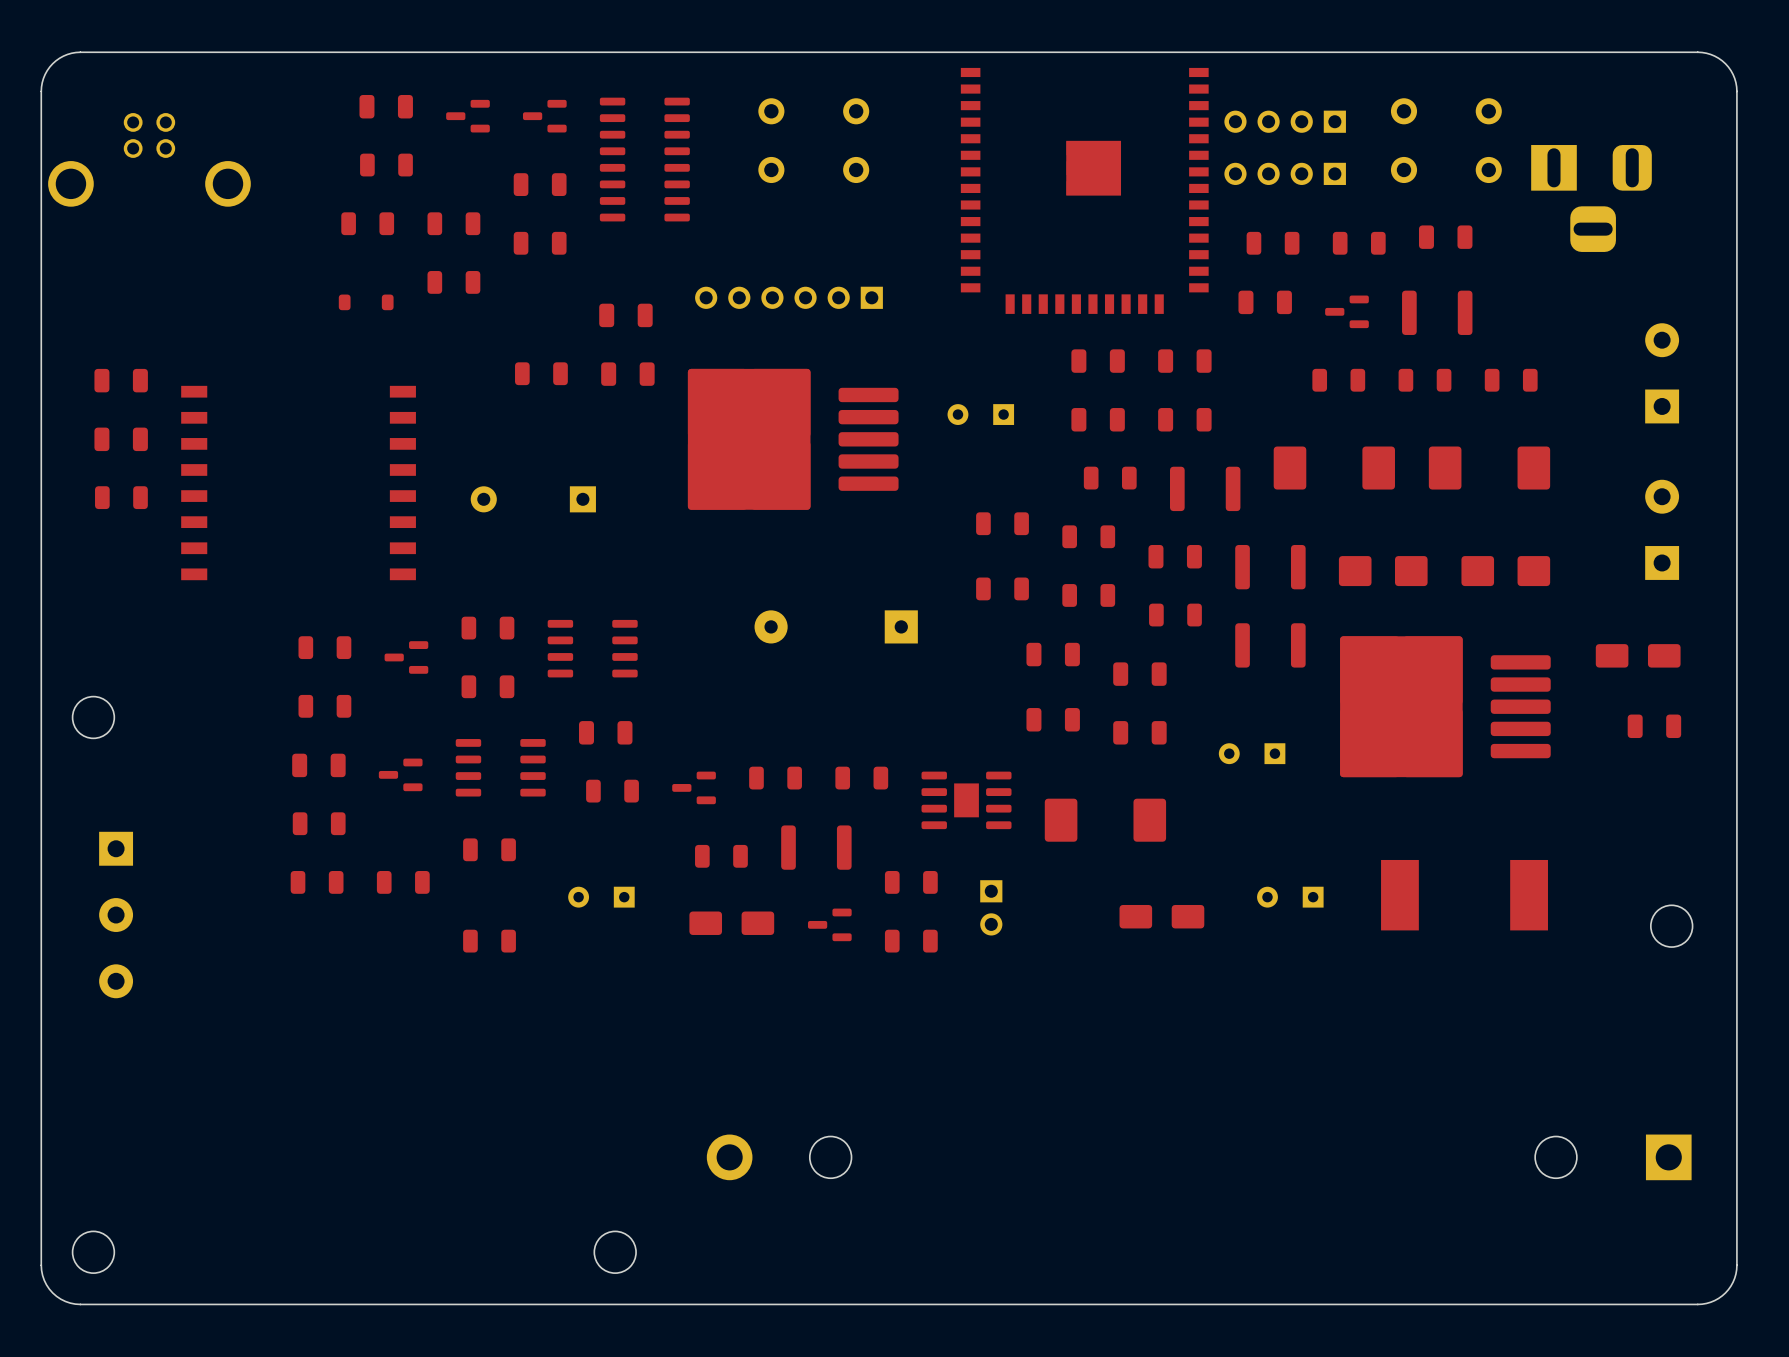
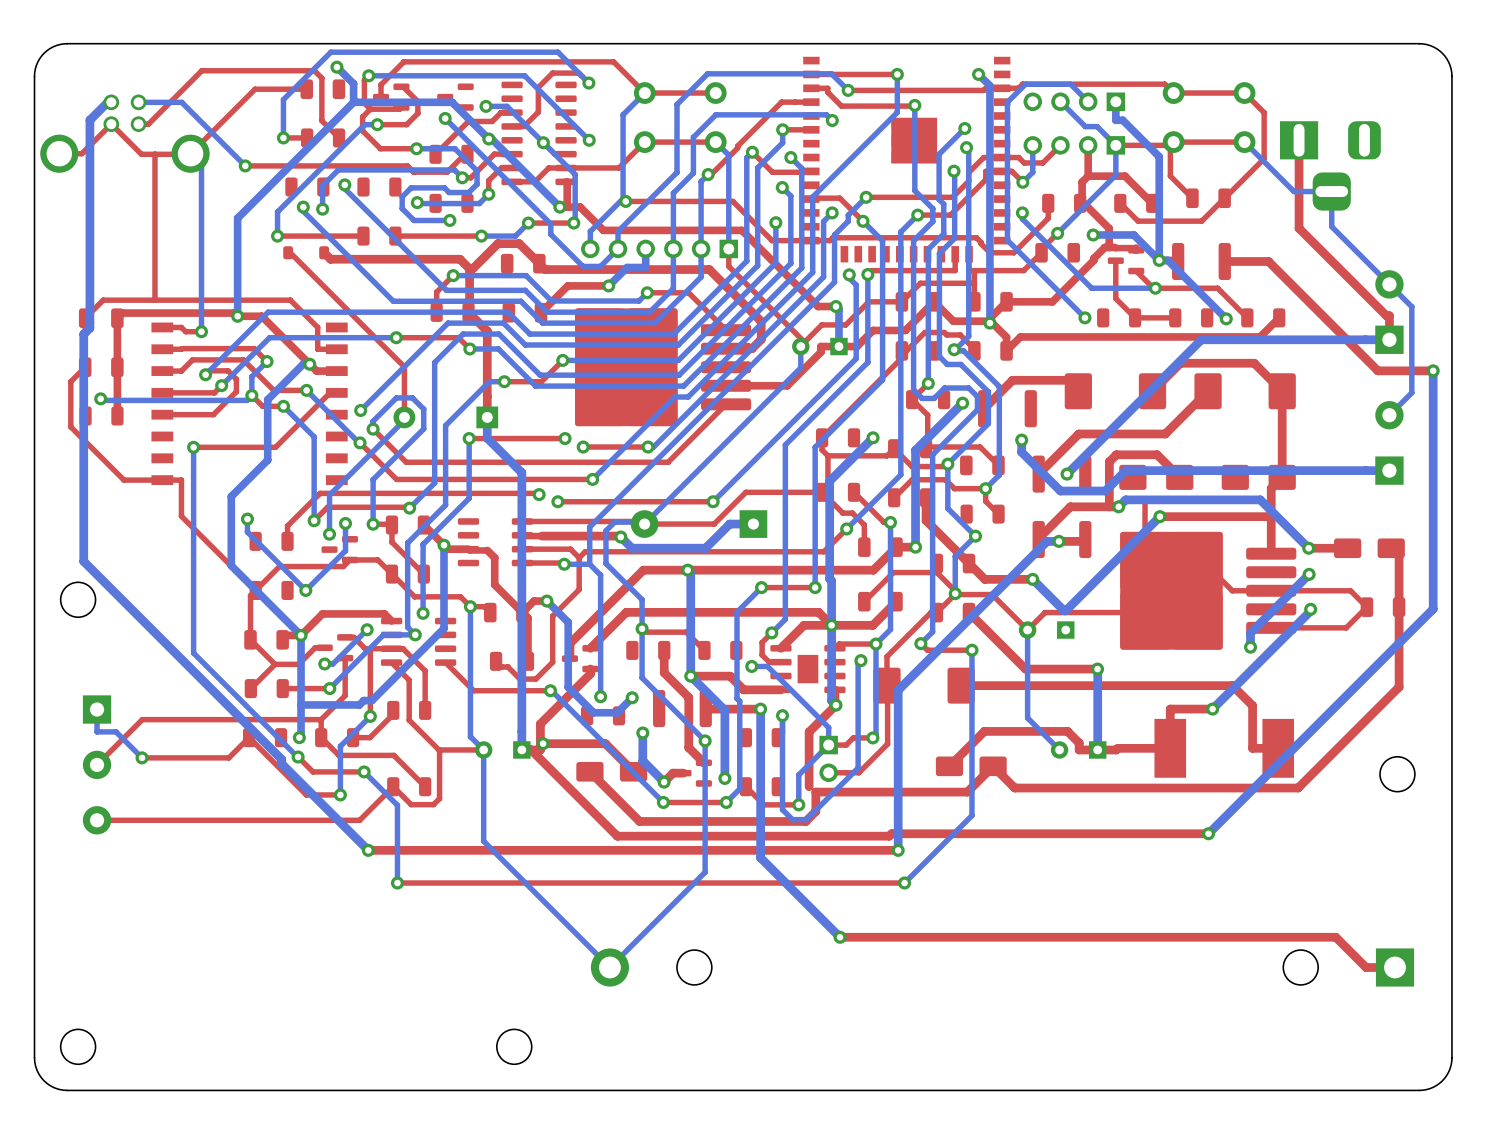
bottom track: none -> (336, 67) (353, 83) (353, 102)
via: none -> (336, 67)
top track: none -> (897, 74) (811, 74)
bottom track: none -> (897, 74) (897, 112) (812, 197) (812, 272) (688, 397) (675, 397) (592, 479)
via: none -> (897, 74)
bottom track: none -> (978, 74) (989, 85) (989, 323)
via: none -> (978, 74)
top track: none -> (368, 75) (364, 80) (364, 103) (370, 109)
bottom track: none -> (368, 75) (524, 75) (589, 140)
via: none -> (368, 75)
top track: none -> (588, 83) (578, 73) (552, 73) (538, 87) (538, 112) (524, 126) (512, 126)
bottom track: none -> (588, 83) (558, 52) (330, 52) (283, 99) (283, 137)
via: none -> (588, 83)
top track: none -> (401, 86) (417, 101) (417, 113) (406, 124) (377, 124)
top track: none -> (811, 88) (827, 88) (827, 92) (841, 106) (914, 105)
top track: none -> (306, 89) (255, 89) (190, 154) (141, 154) (111, 124) (81, 153) (59, 153)
top track: none -> (848, 90) (983, 90) (985, 88) (1018, 88) (1022, 84) (1164, 84) (1173, 93) (1244, 93) (1264, 112) (1264, 158) (1201, 221) (1138, 221) (1120, 203)
bottom track: none -> (848, 90) (831, 73) (707, 73) (677, 104) (677, 172) (618, 231) (618, 248) (600, 266) (582, 266) (550, 234) (550, 224) (445, 118)
via: none -> (848, 90)
bottom track: none -> (644, 93) (623, 114) (623, 198)
top track: none -> (715, 93) (644, 93) (613, 61) (403, 61) (380, 84) (380, 97)
bottom track: none -> (1060, 101) (1085, 126) (1097, 126) (1115, 145) (1115, 175) (1057, 233)
bottom track: none -> (1088, 101) (1070, 84) (1025, 84) (1007, 102) (1007, 240) (1084, 317)
bottom track: none -> (1115, 101) (1115, 120) (1122, 120) (1159, 156) (1159, 260)
bottom track: none -> (111, 102) (107, 102) (89, 120) (89, 328) (83, 334) (83, 561) (281, 759) (281, 763) (368, 850)
bottom track: none -> (138, 102) (181, 102) (245, 165)
bottom track: none -> (353, 102) (237, 218) (237, 316)
bottom track: none -> (353, 102) (452, 102) (559, 207)
top track: none -> (811, 102) (781, 102) (711, 174) (708, 174)
bottom track: none -> (914, 105) (914, 190) (932, 208) (932, 221) (913, 240) (913, 389) (922, 398) (934, 398) (944, 388) (968, 388) (977, 396) (977, 409) (932, 454) (932, 631) (920, 643)
via: none -> (914, 105)
bottom track: none -> (486, 106) (507, 106) (575, 174) (573, 223)
via: none -> (486, 106)
top track: none -> (401, 107) (399, 109) (370, 109)
top track: none -> (370, 109) (362, 117) (362, 130) (380, 148) (416, 148)
top track: none -> (512, 112) (501, 112) (492, 121) (468, 121) (435, 154)
via: none -> (445, 118)
bottom track: none -> (832, 120) (826, 114) (715, 114) (693, 137) (693, 173) (673, 193) (673, 288) (649, 312) (547, 312) (525, 290) (446, 290) (344, 188) (344, 184)
via: none -> (832, 120)
top track: none -> (138, 124) (148, 124) (201, 70) (314, 70) (321, 78) (321, 120) (339, 137)
bottom track: none -> (377, 124) (364, 124) (277, 211) (277, 236)
via: none -> (377, 124)
bottom track: none -> (964, 128) (939, 154) (939, 199) (943, 204) (943, 233) (928, 249) (928, 383)
via: none -> (964, 128)
bottom track: none -> (782, 129) (782, 142) (757, 167) (757, 265) (678, 345) (525, 345) (503, 323) (448, 323) (360, 410)
via: none -> (782, 129)
top track: none -> (811, 129) (782, 129)
via: none -> (283, 137)
top track: none -> (307, 137) (283, 137)
via: none -> (488, 139)
via: none -> (589, 140)
top track: none -> (1299, 140) (1299, 228) (1386, 315) (1389, 315) (1389, 339)
top track: none -> (715, 142) (644, 142) (618, 167) (548, 167) (534, 181) (512, 181)
bottom track: none -> (715, 142) (728, 155) (728, 248)
top track: none -> (1244, 142) (1173, 142) (1170, 145)
bottom track: none -> (1244, 142) (1293, 191) (1331, 191) (1331, 226) (1411, 306) (1411, 392) (1389, 415)
via: none -> (543, 142)
bottom track: none -> (1032, 145) (1032, 172) (1022, 182)
top track: none -> (1060, 145) (1042, 162) (1024, 162) (1018, 157) (983, 157) (968, 172) (968, 181) (952, 197) (866, 197)
top track: none -> (1088, 145) (1088, 176)
top track: none -> (1170, 145) (1170, 176) (1192, 198)
top track: none -> (1170, 145) (1115, 145)
bottom track: none -> (966, 147) (968, 149) (968, 336) (954, 350)
via: none -> (966, 147)
bottom track: none -> (416, 148) (454, 148) (477, 170) (477, 184) (468, 192) (449, 192) (444, 187) (411, 187) (402, 196) (402, 208) (414, 220) (449, 220)
via: none -> (416, 148)
top track: none -> (752, 152) (772, 172) (811, 171)
bottom track: none -> (752, 152) (746, 157) (746, 261) (673, 334) (529, 334) (508, 312) (268, 312) (205, 374)
via: none -> (752, 152)
bottom track: none -> (190, 153) (201, 164) (201, 331)
top track: none -> (154, 154) (154, 300)
top track: none -> (467, 154) (464, 154) (447, 172) (413, 172) (407, 165) (245, 165)
top track: none -> (512, 154) (494, 154) (470, 177) (462, 177)
bottom track: none -> (790, 157) (801, 168) (801, 267) (683, 386) (535, 386) (498, 348) (469, 348)
via: none -> (790, 157)
via: none -> (245, 165)
top track: none -> (512, 167) (501, 167) (488, 180) (488, 194)
bottom track: none -> (954, 171) (954, 238) (939, 253) (939, 356) (947, 364) (960, 364) (988, 391) (988, 423) (947, 464)
via: none -> (954, 171)
bottom track: none -> (708, 174) (701, 181) (701, 277) (654, 323) (542, 323) (520, 301) (393, 301) (303, 211) (303, 207)
via: none -> (708, 174)
top track: none -> (1088, 176) (1082, 182) (1082, 201)
top track: none -> (1088, 176) (1124, 176) (1152, 203)
bottom track: none -> (462, 177) (454, 169) (338, 169) (322, 185) (322, 209)
via: none -> (462, 177)
top track: none -> (566, 181) (567, 207)
top track: none -> (1022, 182) (1011, 171) (985, 171) (985, 179) (950, 215) (917, 215)
via: none -> (1022, 182)
via: none -> (344, 184)
bottom track: none -> (782, 187) (790, 196) (790, 263) (679, 375) (540, 375) (498, 334) (463, 334) (434, 362) (434, 483) (409, 508)
via: none -> (782, 187)
bottom track: none -> (488, 194) (479, 203) (417, 202)
via: none -> (488, 194)
bottom track: none -> (866, 197) (848, 215) (848, 221) (834, 234) (834, 282) (589, 527) (589, 564)
via: none -> (866, 197)
bottom track: none -> (623, 198) (590, 231) (590, 248)
top track: none -> (811, 199) (839, 198) (863, 221)
top track: none -> (625, 201) (732, 201) (772, 240) (830, 240) (832, 237) (976, 237) (990, 252) (1013, 252) (1048, 218) (1048, 203)
via: none -> (625, 201)
top track: none -> (1082, 201) (1109, 228) (1109, 247)
via: none -> (417, 202)
via: none -> (303, 207)
top track: none -> (559, 207) (580, 207) (603, 230) (741, 230) (818, 306) (835, 306)
via: none -> (559, 207)
via: none -> (322, 209)
bottom track: none -> (832, 212) (823, 221) (823, 276) (653, 447) (647, 447)
via: none -> (832, 212)
bottom track: none -> (1022, 212) (1022, 218) (1091, 288) (1155, 288)
via: none -> (1022, 212)
bottom track: none -> (917, 215) (900, 232) (900, 474) (846, 528)
via: none -> (917, 215)
via: none -> (449, 220)
bottom track: none -> (863, 221) (882, 240) (882, 379) (815, 447) (815, 587)
via: none -> (863, 221)
bottom track: none -> (528, 223) (515, 236) (481, 236)
via: none -> (528, 223)
top track: none -> (573, 223) (528, 223)
via: none -> (573, 223)
bottom track: none -> (775, 222) (775, 262) (678, 360) (562, 360)
via: none -> (775, 222)
top track: none -> (1057, 233) (1023, 270) (969, 270) (969, 254)
via: none -> (1057, 233)
bottom track: none -> (1093, 235) (1133, 235) (1159, 260)
via: none -> (1093, 234)
via: none -> (277, 236)
top track: none -> (363, 236) (277, 236)
top track: none -> (481, 236) (395, 236)
via: none -> (481, 236)
bottom track: none -> (645, 248) (645, 267) (627, 267) (608, 285)
top track: none -> (728, 248) (728, 266) (804, 342) (821, 324) (845, 324) (868, 301) (901, 301) (920, 283) (974, 283)
top track: none -> (1136, 250) (1136, 248) (1104, 247) (1052, 301) (1006, 301) (990, 317) (990, 321)
top track: none -> (288, 252) (404, 366) (404, 417)
top track: none -> (324, 252) (330, 259) (459, 259) (469, 268)
top track: none -> (955, 254) (955, 270) (871, 270) (867, 274)
top track: none -> (1115, 260) (1115, 298) (1135, 317) (1175, 317)
bottom track: none -> (1159, 260) (1167, 260) (1226, 318)
via: none -> (1159, 260)
top track: none -> (1224, 261) (1268, 261) (1377, 370) (1433, 370)
top track: none -> (469, 268) (468, 312) (487, 331) (487, 417)
top track: none -> (469, 268) (472, 268) (497, 243) (519, 243) (545, 269) (709, 269) (761, 321) (761, 339) (752, 348) (726, 348)
top track: none -> (974, 270) (974, 301)
top track: none -> (1136, 271) (1153, 288) (1217, 288) (1247, 317)
bottom track: none -> (849, 274) (849, 278) (856, 285) (856, 358) (713, 501)
via: none -> (849, 274)
bottom track: none -> (867, 274) (867, 362) (785, 444) (785, 619) (771, 632)
via: none -> (867, 274)
top track: none -> (453, 275) (436, 292) (436, 312)
bottom track: none -> (453, 275) (526, 275) (551, 301) (639, 301) (647, 292)
via: none -> (453, 275)
top track: none -> (608, 285) (567, 285) (540, 312)
via: none -> (608, 285)
via: none -> (1155, 288)
top track: none -> (647, 292) (688, 292) (726, 330)
via: none -> (647, 292)
bottom track: none -> (835, 306) (838, 309) (838, 346)
via: none -> (835, 306)
via: none -> (237, 316)
via: none -> (1084, 317)
top track: none -> (1279, 317) (1260, 336) (1020, 336) (1006, 350) (1006, 337) (990, 321)
via: none -> (1226, 318)
top track: none -> (990, 321) (953, 321) (934, 301) (905, 330) (873, 330) (856, 346) (820, 346) (820, 352) (787, 385) (726, 385)
via: none -> (989, 323)
top track: none -> (162, 327) (181, 327) (185, 331) (201, 331)
via: none -> (201, 331)
top track: none -> (396, 337) (458, 337) (469, 348)
bottom track: none -> (396, 337) (269, 337) (221, 385)
via: none -> (396, 337)
bottom track: none -> (1389, 339) (1201, 339) (1067, 474)
bottom track: none -> (800, 346) (800, 367) (644, 524) (642, 522) (614, 522) (605, 530) (605, 563) (642, 599) (642, 677) (705, 740) (705, 872) (609, 967) (483, 841) (483, 749) (470, 736) (470, 606)
top track: none -> (162, 349) (254, 348) (267, 361)
top track: none -> (336, 349) (317, 349) (317, 327) (290, 300) (103, 300) (85, 318) (85, 367) (70, 381) (70, 426) (123, 480) (181, 480) (181, 516) (255, 590)
via: none -> (469, 348)
via: none -> (954, 349)
bottom track: none -> (954, 350) (963, 350) (999, 386) (999, 475) (985, 488)
top track: none -> (974, 350) (960, 334) (924, 332) (906, 350) (901, 350) (901, 358) (822, 437) (822, 450) (827, 455)
top track: none -> (562, 360) (541, 381) (504, 381)
via: none -> (562, 360)
bottom track: none -> (267, 361) (251, 376) (251, 395) (246, 400) (102, 400) (100, 398)
via: none -> (267, 361)
bottom track: none -> (309, 364) (303, 364) (267, 399) (267, 460) (231, 496) (231, 565) (301, 635) (301, 735) (299, 737)
via: none -> (309, 364)
top track: none -> (162, 371) (181, 371) (192, 359) (243, 359) (273, 390) (306, 390)
top track: none -> (336, 371) (316, 371) (261, 316) (237, 316) (234, 313) (122, 313) (117, 318) (117, 415)
bottom track: none -> (1433, 370) (1433, 609) (1208, 833)
via: none -> (1433, 370)
top track: none -> (205, 374) (209, 370) (227, 370) (236, 379) (236, 391) (213, 414) (162, 414)
via: none -> (205, 374)
bottom track: none -> (504, 381) (489, 381) (445, 425) (445, 505) (407, 543) (407, 627) (415, 634) (383, 634) (329, 688)
via: none -> (504, 381)
top track: none -> (928, 383) (912, 399) (927, 415) (927, 447)
via: none -> (928, 383)
top track: none -> (221, 385) (214, 392) (162, 392)
via: none -> (221, 385)
bottom track: none -> (306, 390) (360, 442)
via: none -> (306, 390)
top track: none -> (1078, 391) (1067, 380) (1012, 380) (984, 408)
top track: none -> (1152, 391) (1180, 363) (1254, 363) (1282, 391) (1282, 477) (1271, 488) (1271, 553)
top track: none -> (1208, 391) (1165, 433) (1078, 433) (1038, 474)
top track: none -> (336, 392) (330, 392) (275, 447) (193, 447)
top track: none -> (251, 395) (262, 406) (283, 406)
via: none -> (251, 395)
via: none -> (100, 398)
bottom track: none -> (962, 403) (915, 450) (915, 547)
via: none -> (962, 403)
top track: none -> (726, 404) (668, 462) (406, 462) (373, 429)
bottom track: none -> (283, 406) (314, 436) (314, 520)
via: none -> (283, 406)
via: none -> (360, 410)
bottom track: none -> (404, 417) (404, 420) (329, 495) (329, 534)
bottom track: none -> (487, 417) (487, 438) (521, 472) (521, 749)
bottom track: none -> (373, 429) (373, 421) (396, 397) (412, 397) (423, 409) (423, 428) (373, 479) (373, 524)
via: none -> (373, 429)
bottom track: none -> (873, 437) (829, 481) (831, 700) (835, 705)
via: none -> (873, 437)
bottom track: none -> (469, 438) (469, 498) (423, 544) (423, 613)
via: none -> (469, 438)
top track: none -> (565, 438) (469, 438)
via: none -> (565, 438)
bottom track: none -> (1021, 440) (1021, 452) (1060, 491) (1105, 491) (1125, 470) (1389, 470)
via: none -> (1021, 440)
top track: none -> (360, 442) (396, 479) (592, 479)
via: none -> (360, 442)
via: none -> (583, 447)
top track: none -> (647, 447) (583, 447)
via: none -> (647, 447)
top track: none -> (927, 447) (980, 447) (998, 465)
bottom track: none -> (193, 447) (193, 653) (298, 757)
via: none -> (193, 447)
top track: none -> (827, 455) (827, 486) (822, 492)
top track: none -> (827, 455) (887, 455) (894, 448) (912, 466) (945, 466) (947, 464)
bottom track: none -> (947, 464) (947, 508) (975, 536) (955, 556) (955, 593)
via: none -> (947, 464)
via: none -> (1067, 474)
top track: none -> (1179, 477) (1157, 454) (1116, 454) (1109, 461) (1109, 506)
via: none -> (592, 479)
via: none -> (985, 488)
top track: none -> (822, 492) (842, 513) (852, 513) (864, 524) (864, 547)
top track: none -> (822, 492) (745, 492) (714, 524) (644, 524) (642, 521) (522, 521)
top track: none -> (853, 492) (884, 522) (890, 522)
top track: none -> (539, 494) (320, 493) (287, 525) (287, 541)
via: none -> (539, 494)
top track: none -> (894, 497) (912, 479) (945, 479) (954, 488) (985, 488) (985, 501) (998, 514)
top track: none -> (926, 497) (926, 520) (984, 579) (1032, 579)
top track: none -> (1145, 498) (1145, 560) (1202, 560) (1232, 590) (1350, 590) (1366, 607) (1346, 627) (1271, 627)
via: none -> (557, 501)
top track: none -> (713, 501) (557, 501)
via: none -> (713, 501)
top track: none -> (1118, 506) (1070, 506) (1038, 539)
bottom track: none -> (1118, 506) (1125, 499) (1260, 499) (1308, 548)
via: none -> (1118, 506)
top track: none -> (409, 508) (327, 507) (314, 520)
via: none -> (409, 508)
bottom track: none -> (1159, 516) (1065, 610) (1032, 579)
via: none -> (1159, 516)
top track: none -> (1271, 516) (1159, 516)
bottom track: none -> (247, 519) (247, 532) (305, 590) (345, 550) (345, 523)
via: none -> (247, 519)
via: none -> (314, 520)
bottom track: none -> (890, 522) (890, 629) (876, 644) (876, 734) (872, 737)
via: none -> (890, 522)
via: none -> (345, 523)
bottom track: none -> (753, 524) (729, 524) (705, 548) (631, 548) (620, 537)
top track: none -> (373, 524) (391, 524) (391, 542) (423, 574)
via: none -> (373, 524)
top track: none -> (423, 525) (447, 549) (487, 550) (494, 557) (494, 584) (527, 618) (527, 661)
top track: none -> (846, 528) (823, 551) (585, 551) (579, 557)
via: none -> (846, 528)
via: none -> (329, 534)
top track: none -> (522, 535) (620, 537)
via: none -> (975, 536)
via: none -> (620, 537)
top track: none -> (1085, 539) (1083, 541) (1058, 541)
bottom track: none -> (1058, 541) (1047, 541) (898, 690) (898, 850)
via: none -> (1058, 541)
bottom track: none -> (443, 545) (443, 628) (371, 700) (363, 700) (359, 704) (301, 704)
via: none -> (443, 545)
top track: none -> (915, 547) (896, 547) (873, 570) (643, 570) (569, 643) (569, 658)
via: none -> (915, 547)
via: none -> (1308, 548)
top track: none -> (1347, 548) (1308, 548)
top track: none -> (1391, 548) (1399, 556) (1399, 687) (1298, 788) (1014, 788) (993, 766) (967, 792) (815, 792) (815, 811) (805, 821) (639, 821) (589, 771)
top track: none -> (522, 549) (570, 549) (579, 557)
top track: none -> (579, 557) (579, 589) (552, 616) (552, 662) (535, 679) (520, 679) (507, 666) (501, 666) (496, 661)
top track: none -> (522, 563) (564, 564)
via: none -> (564, 564)
bottom track: none -> (589, 564) (564, 564)
bottom track: none -> (589, 564) (600, 575) (600, 696)
bottom track: none -> (687, 570) (690, 573) (690, 676) (724, 710) (724, 778)
via: none -> (687, 570)
top track: none -> (936, 572) (893, 572) (864, 601)
top track: none -> (936, 572) (954, 590) (954, 594)
bottom track: none -> (1309, 574) (1250, 633) (1250, 647)
via: none -> (1309, 574)
via: none -> (1032, 579)
bottom track: none -> (761, 587) (737, 612) (739, 789) (726, 802)
via: none -> (761, 587)
top track: none -> (815, 587) (761, 587)
via: none -> (815, 587)
via: none -> (305, 590)
via: none -> (955, 593)
top track: none -> (954, 594) (936, 612) (930, 612) (887, 656) (887, 744) (858, 772) (828, 772)
top track: none -> (954, 594) (992, 594) (1027, 630) (1045, 612) (1136, 612) (1145, 621) (1197, 621)
top track: none -> (546, 601) (533, 601) (522, 612)
bottom track: none -> (546, 601) (568, 622) (568, 687) (593, 712) (617, 712) (632, 697)
via: none -> (546, 601)
top track: none -> (896, 601) (872, 625) (803, 625) (780, 648)
via: none -> (470, 606)
bottom track: none -> (1310, 609) (1212, 709)
via: none -> (1310, 609)
top track: none -> (490, 612) (484, 606) (470, 606) (460, 596) (414, 596) (377, 559) (349, 559) (343, 566) (279, 566) (250, 595) (250, 639) (275, 664) (298, 664) (315, 647) (324, 647)
top track: none -> (968, 612) (1025, 669) (1097, 669)
via: none -> (423, 613)
top track: none -> (391, 621) (384, 613) (322, 613) (301, 635) (287, 635) (282, 639)
top track: none -> (831, 625) (818, 612) (626, 612) (590, 648)
via: none -> (831, 625)
via: none -> (642, 628)
bottom track: none -> (367, 629) (332, 663) (324, 663)
via: none -> (367, 629)
bottom track: none -> (1027, 630) (1027, 718) (1059, 749)
top track: none -> (642, 632) (686, 632) (704, 650)
top track: none -> (771, 632) (762, 642) (762, 655) (769, 662) (780, 662)
via: none -> (771, 632)
via: none -> (415, 634)
via: none -> (301, 635)
top track: none -> (345, 637) (353, 637) (365, 648) (402, 648) (425, 670) (425, 710)
top track: none -> (920, 643) (927, 650) (971, 650)
via: none -> (920, 643)
top track: none -> (876, 644) (839, 644) (834, 648)
via: none -> (876, 644)
via: none -> (1250, 647)
top track: none -> (370, 648) (370, 716)
bottom track: none -> (971, 650) (971, 815) (904, 883)
via: none -> (971, 650)
top track: none -> (664, 650) (664, 672) (688, 697) (688, 747) (703, 762)
top track: none -> (345, 658) (345, 695) (321, 719)
bottom track: none -> (860, 660) (858, 663) (858, 767) (806, 819) (792, 819) (782, 809) (782, 715)
via: none -> (860, 660)
top track: none -> (391, 662) (409, 680) (409, 720) (438, 749) (483, 749)
top track: none -> (445, 662) (473, 690) (550, 690)
top track: none -> (275, 664) (250, 688)
via: none -> (324, 663)
bottom track: none -> (751, 666) (767, 666) (828, 727) (828, 745) (798, 774) (798, 804)
via: none -> (751, 666)
top track: none -> (590, 669) (590, 673) (540, 723) (540, 749) (521, 749)
bottom track: none -> (1097, 669) (1097, 749)
via: none -> (1097, 669)
top track: none -> (690, 676) (730, 676) (743, 689) (780, 689)
via: none -> (690, 676)
top track: none -> (961, 685) (1232, 685) (1252, 705) (1252, 748) (1278, 748)
top track: none -> (329, 688) (282, 688)
via: none -> (329, 688)
top track: none -> (834, 689) (835, 705) (809, 732) (809, 786)
bottom track: none -> (550, 690) (663, 802)
via: none -> (550, 690)
via: none -> (600, 696)
via: none -> (632, 697)
via: none -> (835, 705)
top track: none -> (705, 708) (760, 709)
bottom track: none -> (97, 709) (97, 731) (116, 731) (142, 757)
bottom track: none -> (760, 709) (760, 857) (840, 937)
via: none -> (760, 709)
top track: none -> (1212, 709) (1170, 709) (1170, 748) (1079, 749) (1079, 743) (1067, 731) (984, 731) (949, 766)
via: none -> (1212, 709)
top track: none -> (393, 710) (393, 714) (369, 737) (353, 737)
via: none -> (782, 715)
bottom track: none -> (370, 716) (340, 746) (340, 794)
via: none -> (370, 716)
top track: none -> (321, 719) (142, 719) (97, 764)
top track: none -> (321, 719) (321, 737) (338, 755) (393, 755) (425, 786)
bottom track: none -> (642, 732) (642, 760) (664, 782)
via: none -> (642, 732)
via: none -> (299, 737)
top track: none -> (872, 737) (853, 737) (846, 745) (828, 745)
via: none -> (872, 737)
via: none -> (705, 740)
top track: none -> (543, 743) (605, 743) (633, 771)
via: none -> (543, 743)
top track: none -> (439, 749) (439, 798) (433, 804) (411, 804) (393, 786) (359, 820) (97, 820)
top track: none -> (531, 749) (617, 836) (1208, 833)
top track: none -> (298, 757) (313, 771) (364, 771)
via: none -> (298, 757)
top track: none -> (142, 757) (228, 757) (249, 737) (306, 794) (340, 794)
via: none -> (142, 757)
bottom track: none -> (364, 771) (397, 805) (397, 883)
via: none -> (364, 771)
top track: none -> (683, 773) (673, 773) (664, 782)
via: none -> (724, 778)
via: none -> (664, 782)
top track: none -> (745, 786) (764, 804) (798, 804)
via: none -> (340, 794)
via: none -> (663, 802)
top track: none -> (726, 802) (663, 802)
via: none -> (726, 802)
via: none -> (798, 804)
via: none -> (1208, 833)
via: none -> (368, 850)
top track: none -> (898, 850) (368, 850)
via: none -> (898, 850)
via: none -> (397, 883)
top track: none -> (904, 883) (397, 883)
via: none -> (904, 883)
top track: none -> (840, 937) (1335, 937) (1366, 967) (1394, 967)
via: none -> (840, 937)

